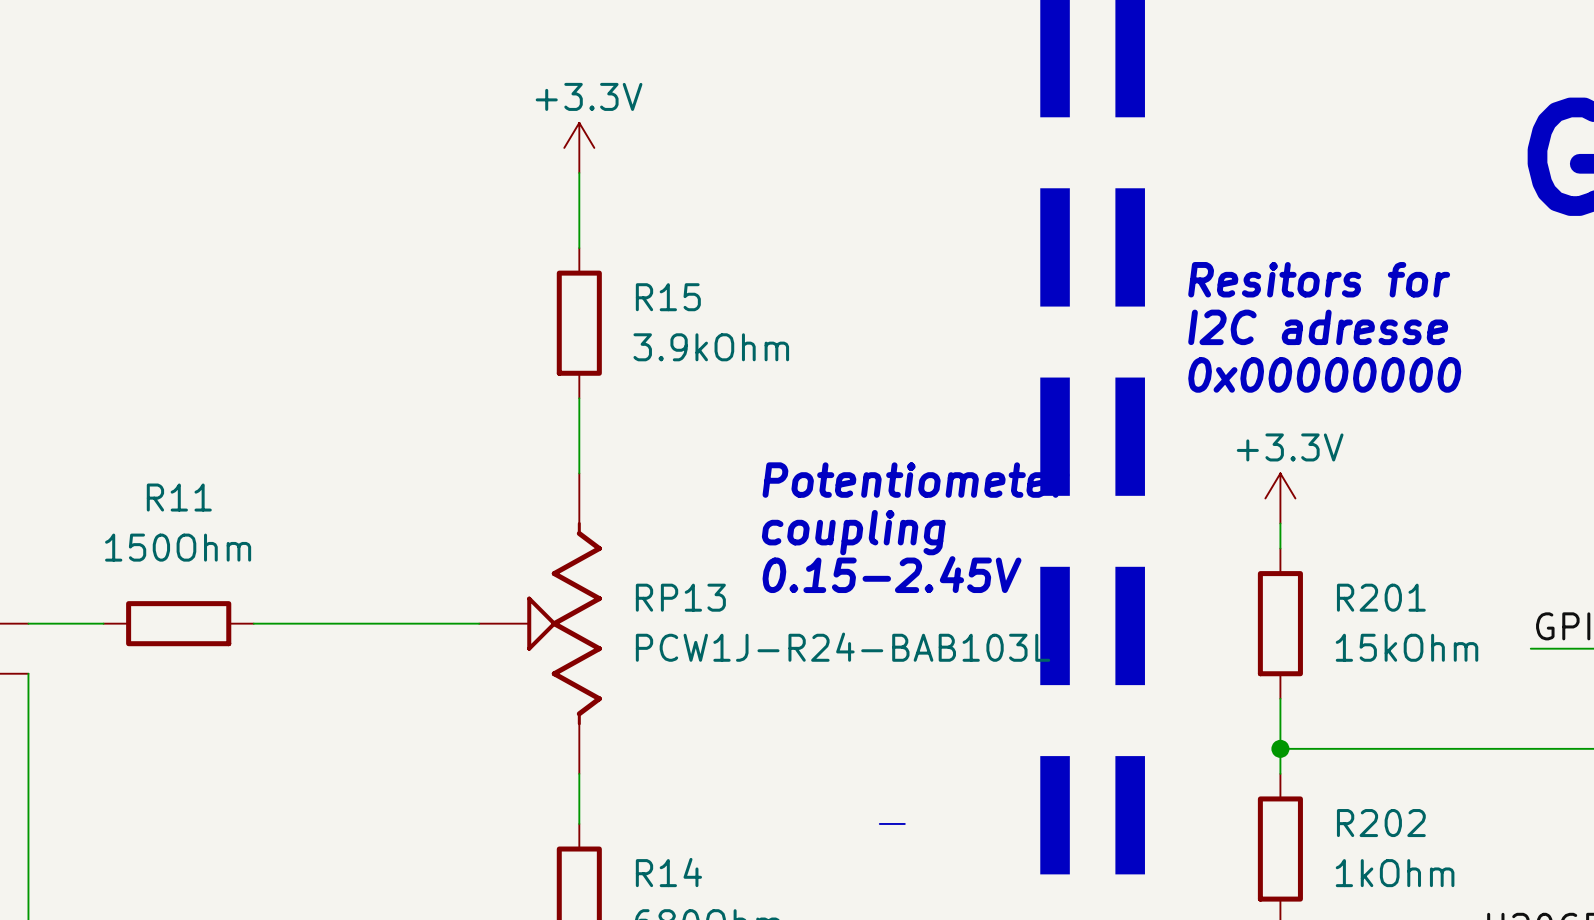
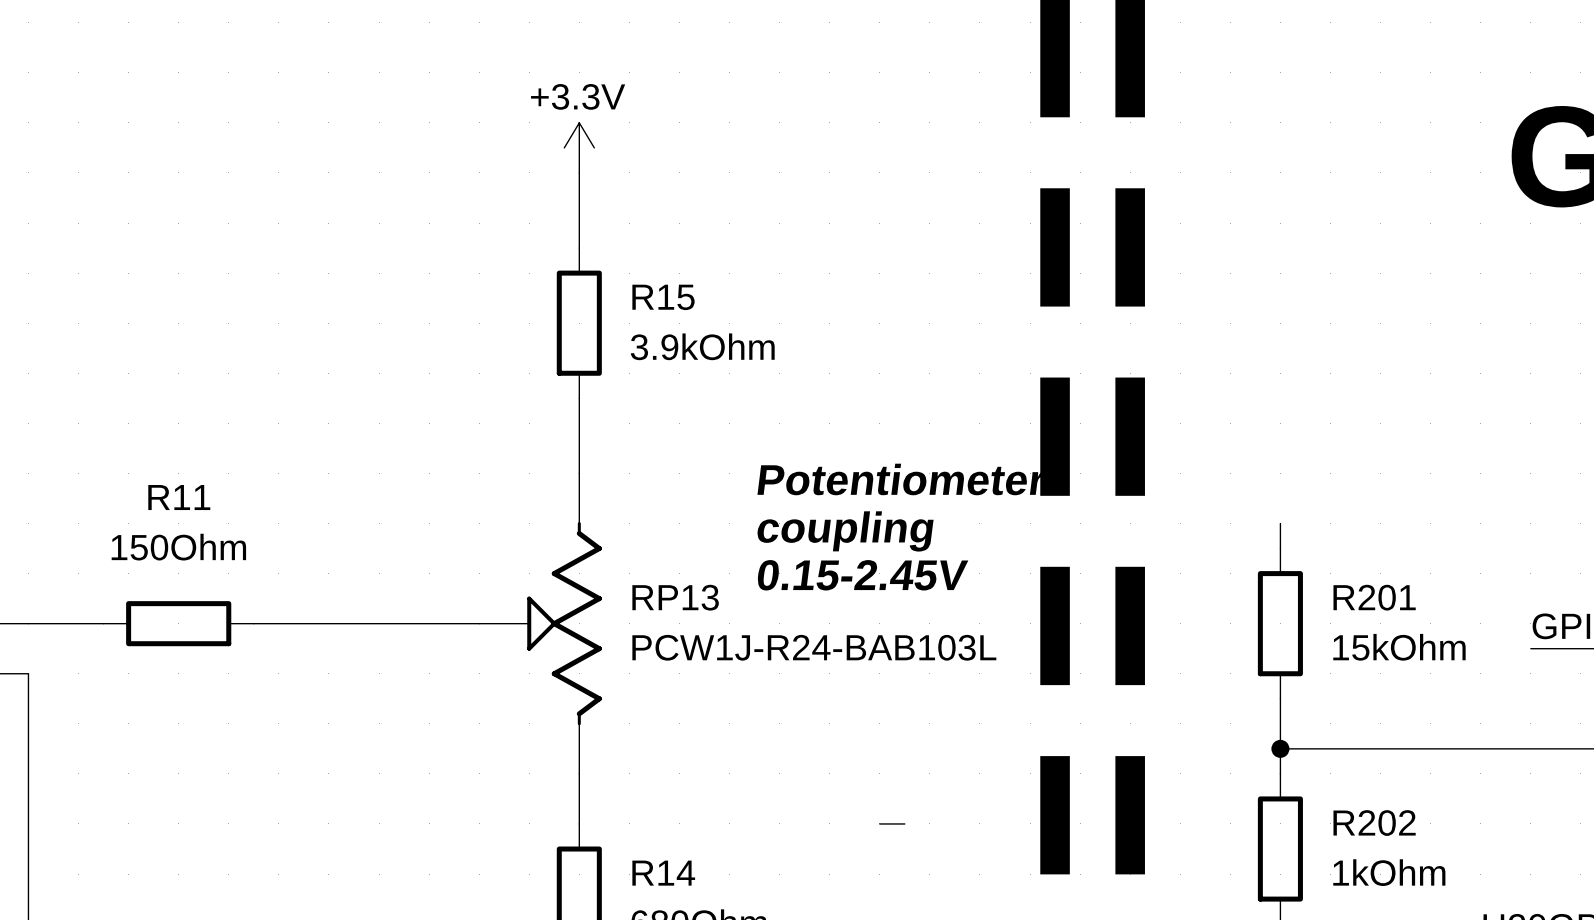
text: Resitors for (1319, 279) -> none
text: I2C adresse (1318, 327) -> none
text: 0x00000000 (1324, 374) -> none
power symbol: +3.3V (1280, 498) -> none

